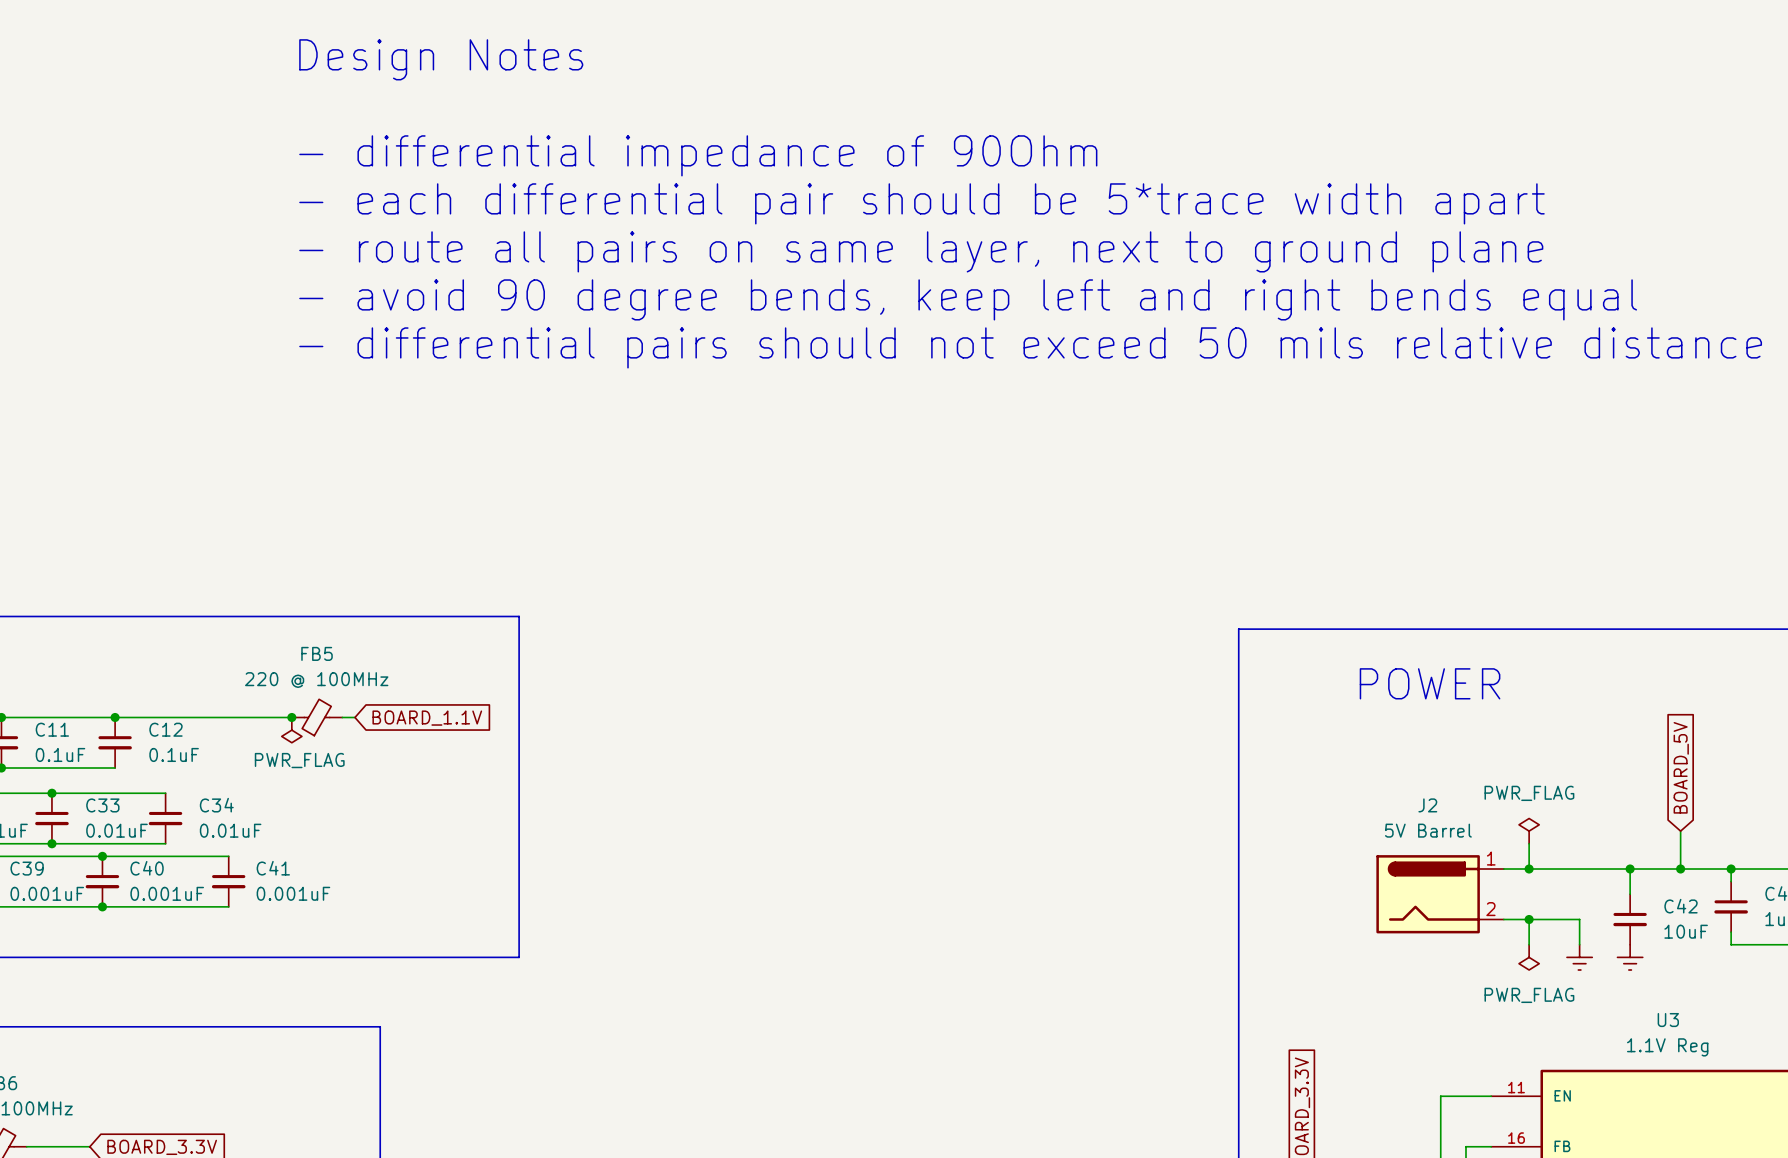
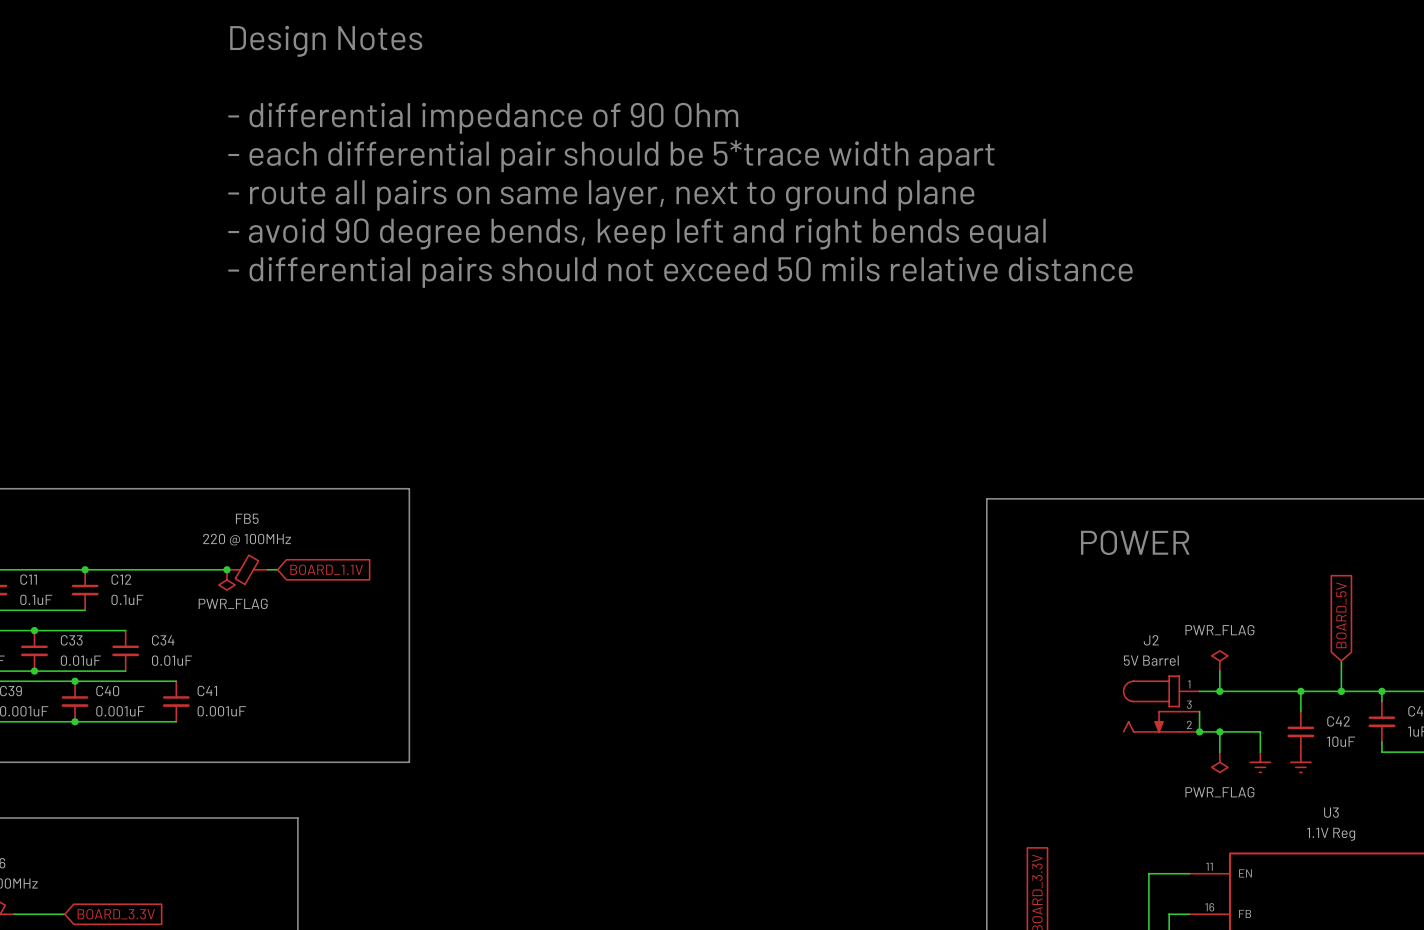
text: - differential impedance of 90Ohm (698, 155) -> - differential impedance of 90 Ohm (483, 118)
J2 symbol: [1376, 855, 1504, 934] -> [1122, 675, 1200, 733]
wire: none -> (1199, 711) (1199, 731)
junction: none -> (1199, 731)

